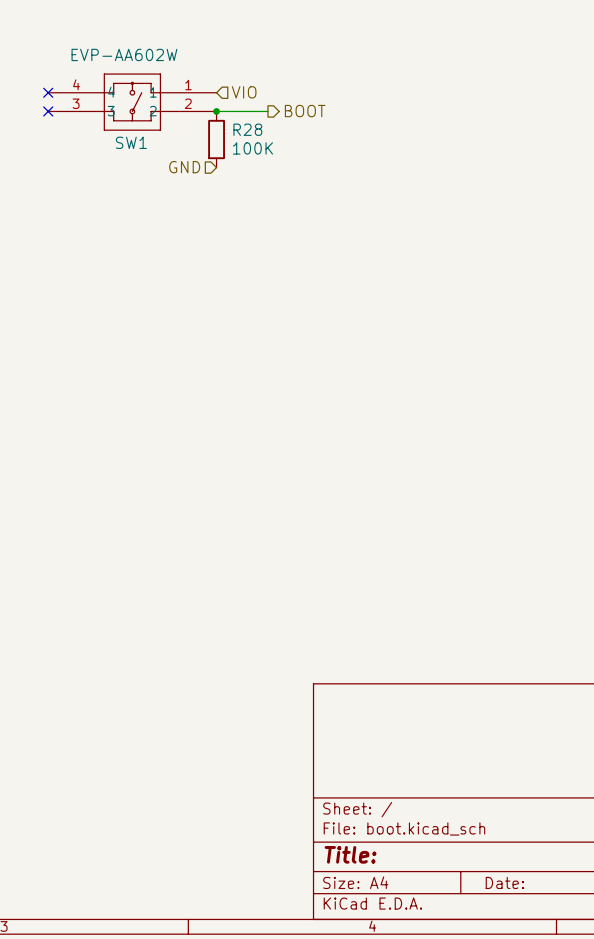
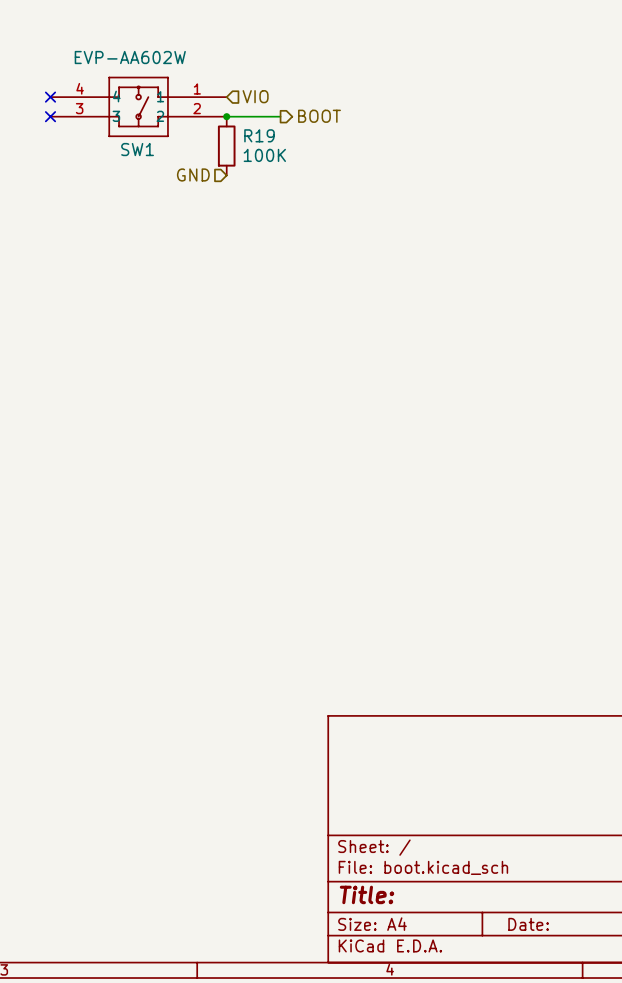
R28 name: R28 (247, 129) -> R19 (259, 135)

